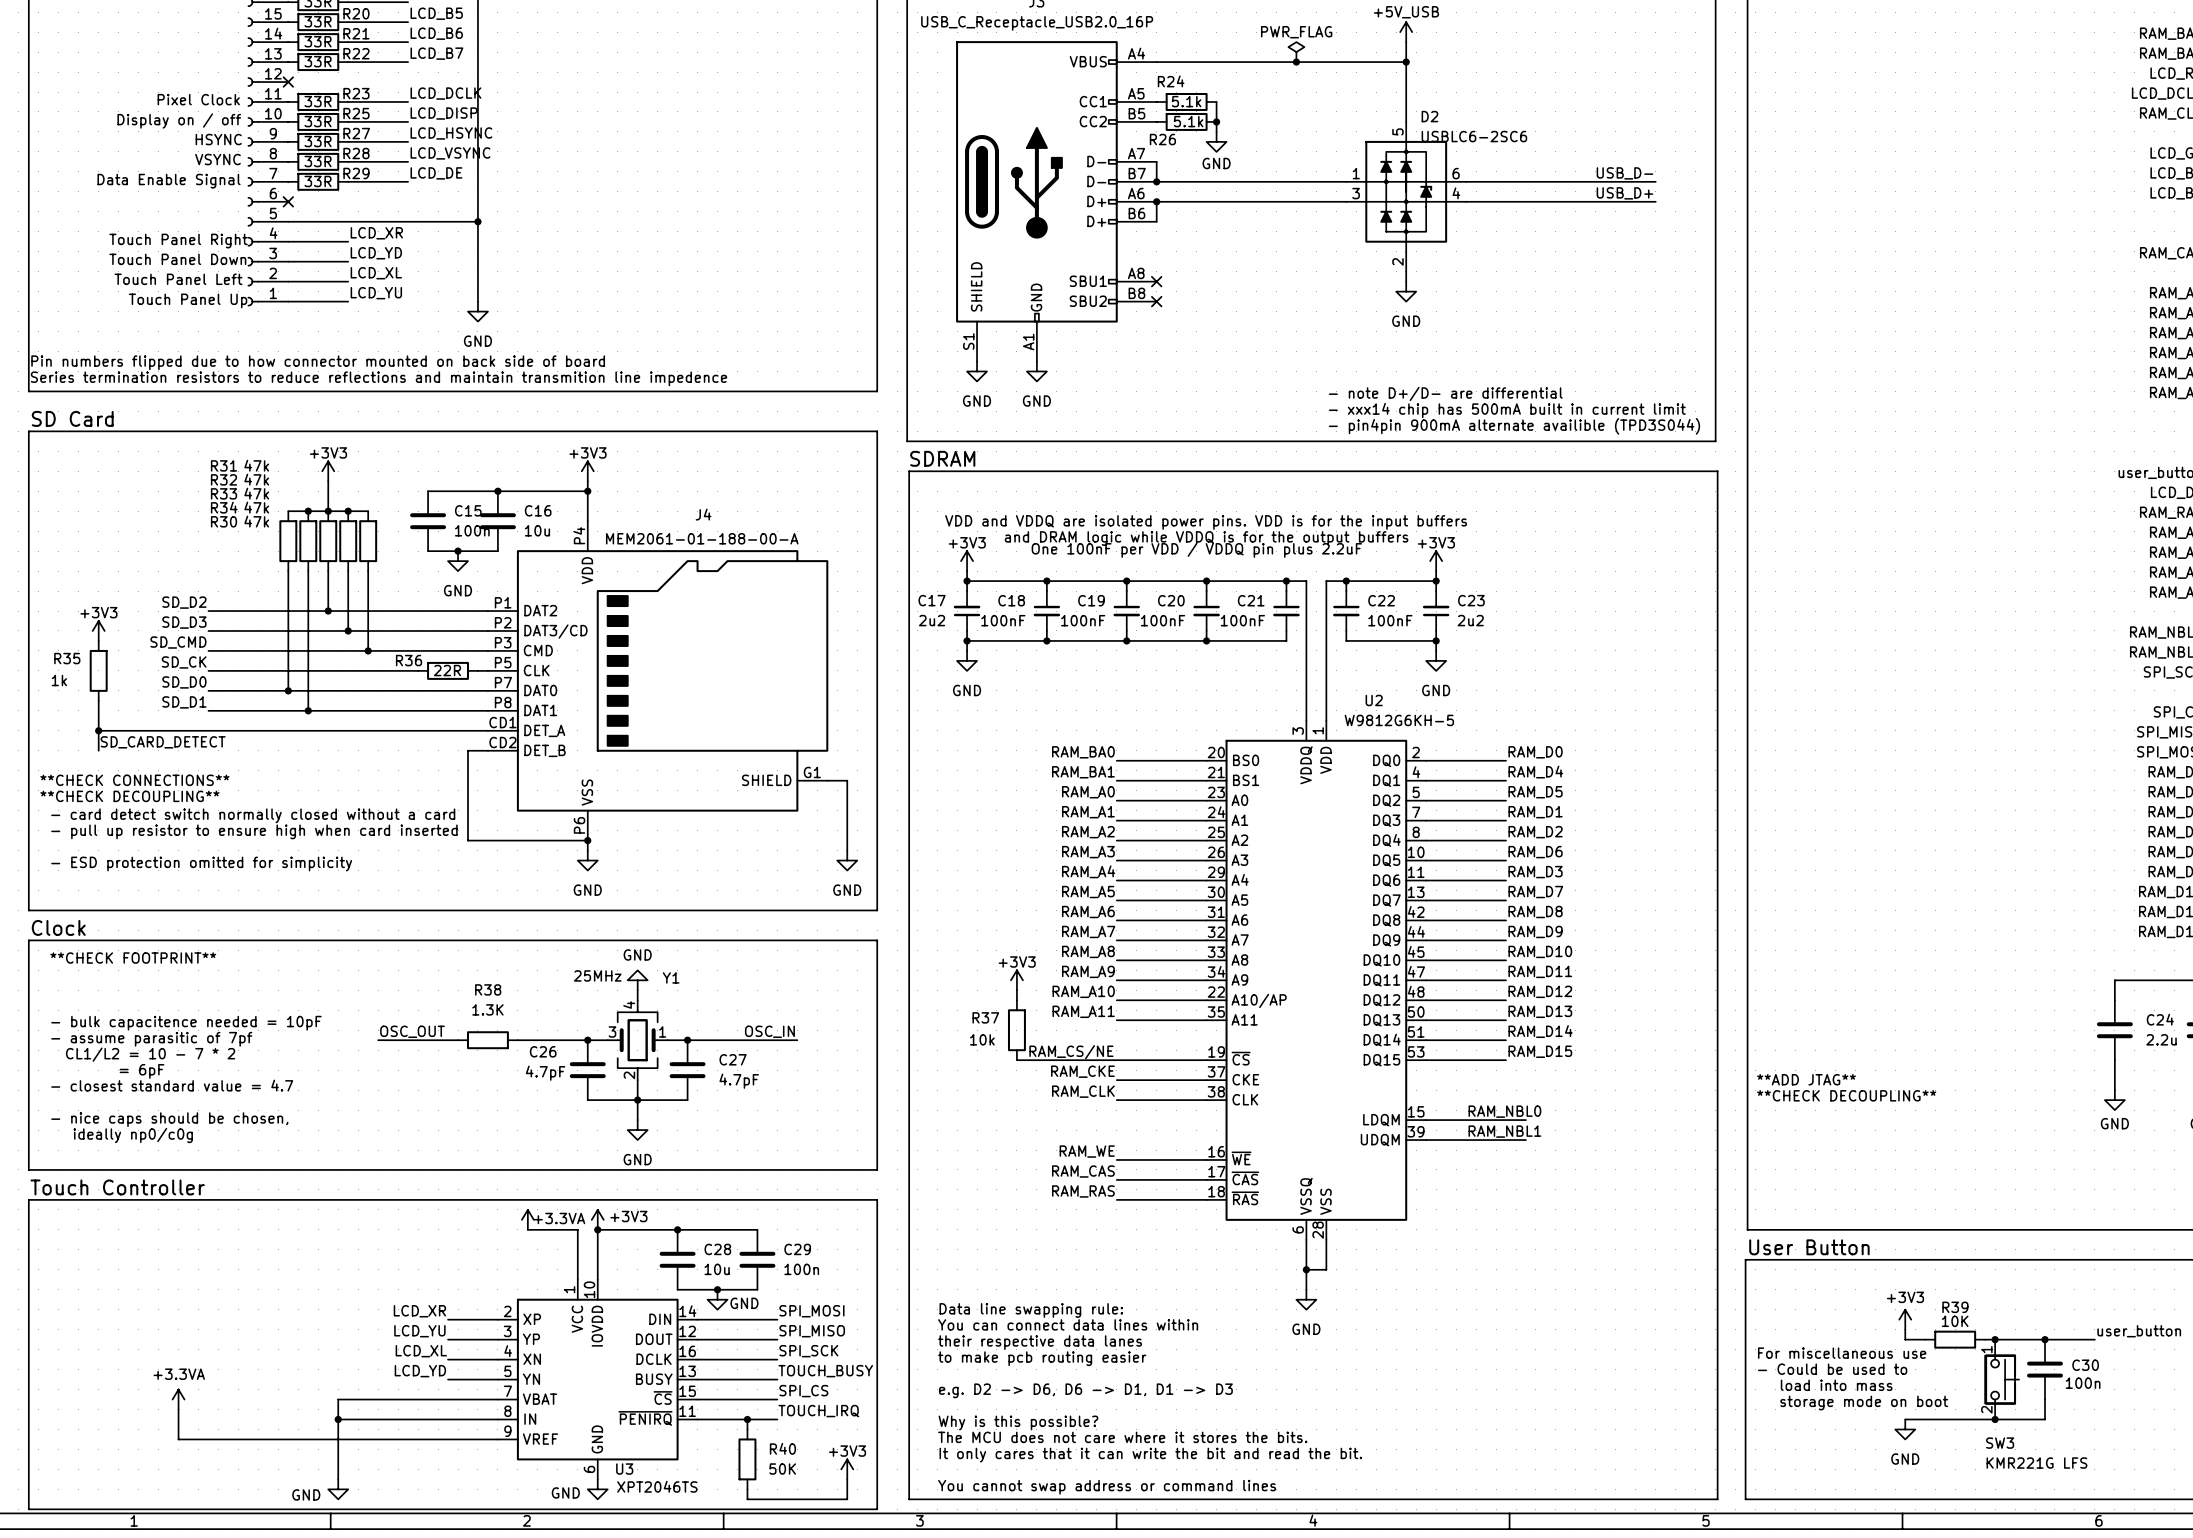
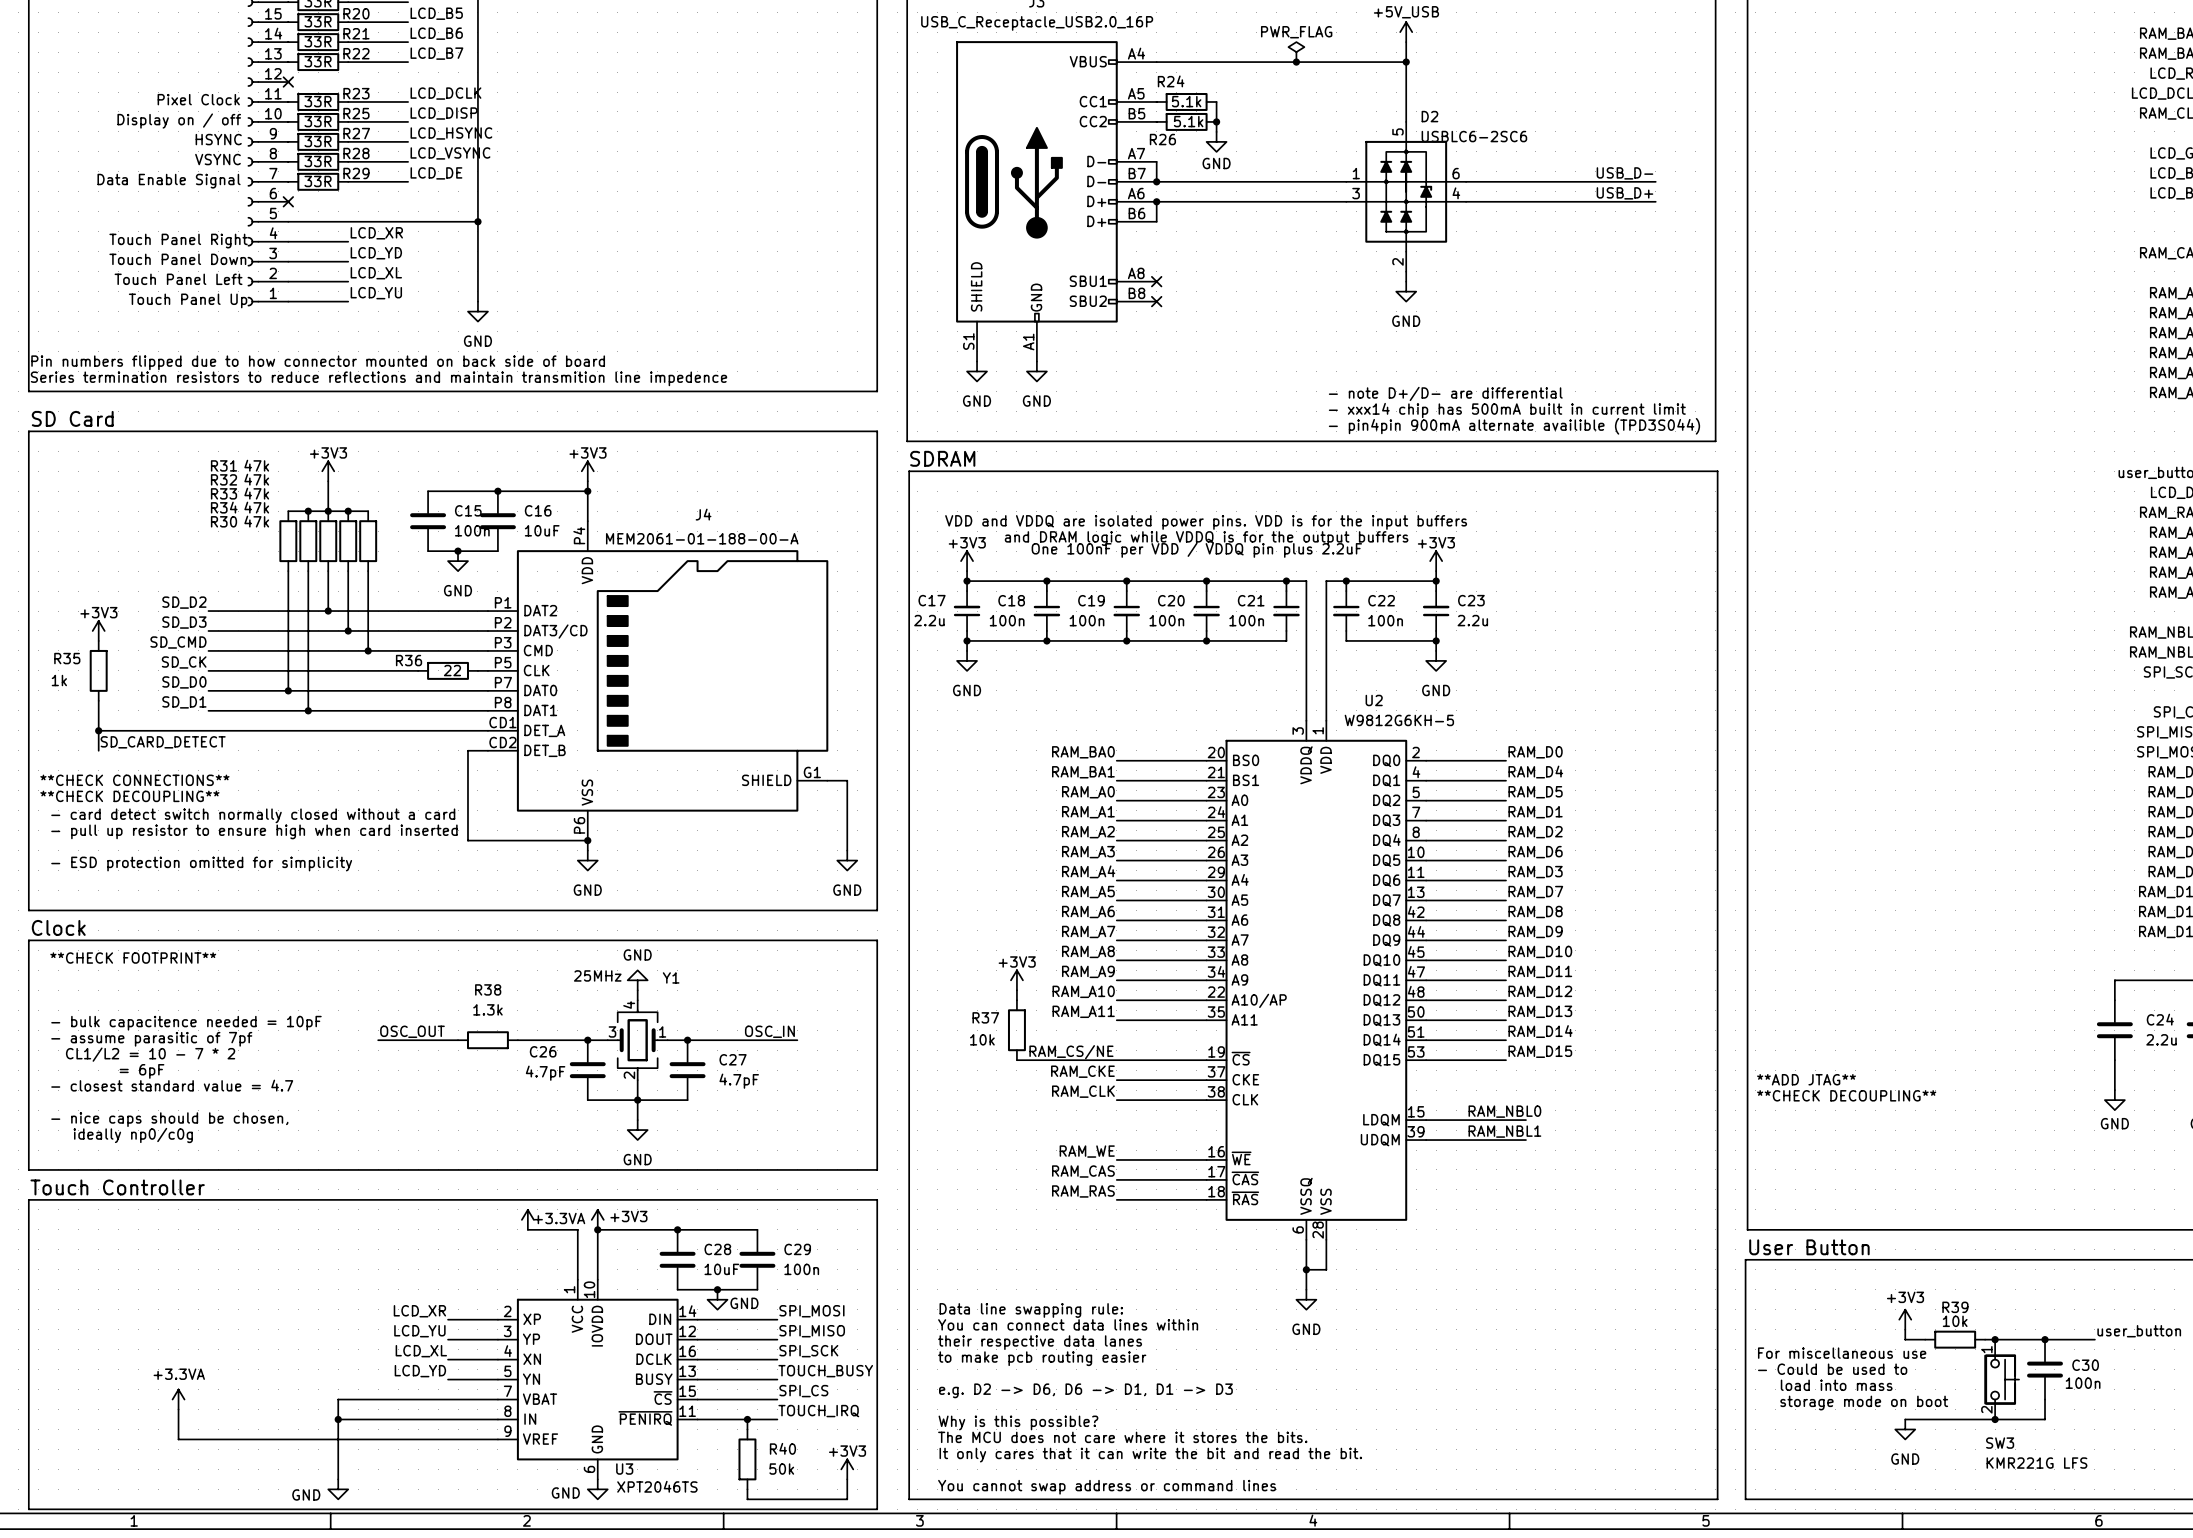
C16 value: 10u (537, 530) -> 10uF (542, 530)
C17 value: 2u2 (932, 620) -> 2.2u (929, 620)
C18 value: 100nF (1003, 620) -> 100n (1007, 620)
C19 value: 100nF (1083, 620) -> 100n (1086, 620)
C20 value: 100nF (1163, 620) -> 100n (1166, 620)
C21 value: 100nF (1242, 620) -> 100n (1246, 620)
C22 value: 100nF (1390, 620) -> 100n (1385, 620)
C23 value: 2u2 (1470, 620) -> 2.2u (1472, 620)
R36 value: 22R (447, 670) -> 22 (452, 670)
R38 value: 1.3K (487, 1009) -> 1.3k (487, 1009)
C28 value: 10u (717, 1269) -> 10uF (721, 1269)
R39 value: 10K (1955, 1321) -> 10k (1955, 1321)
R40 value: 50K (782, 1469) -> 50k (781, 1469)

